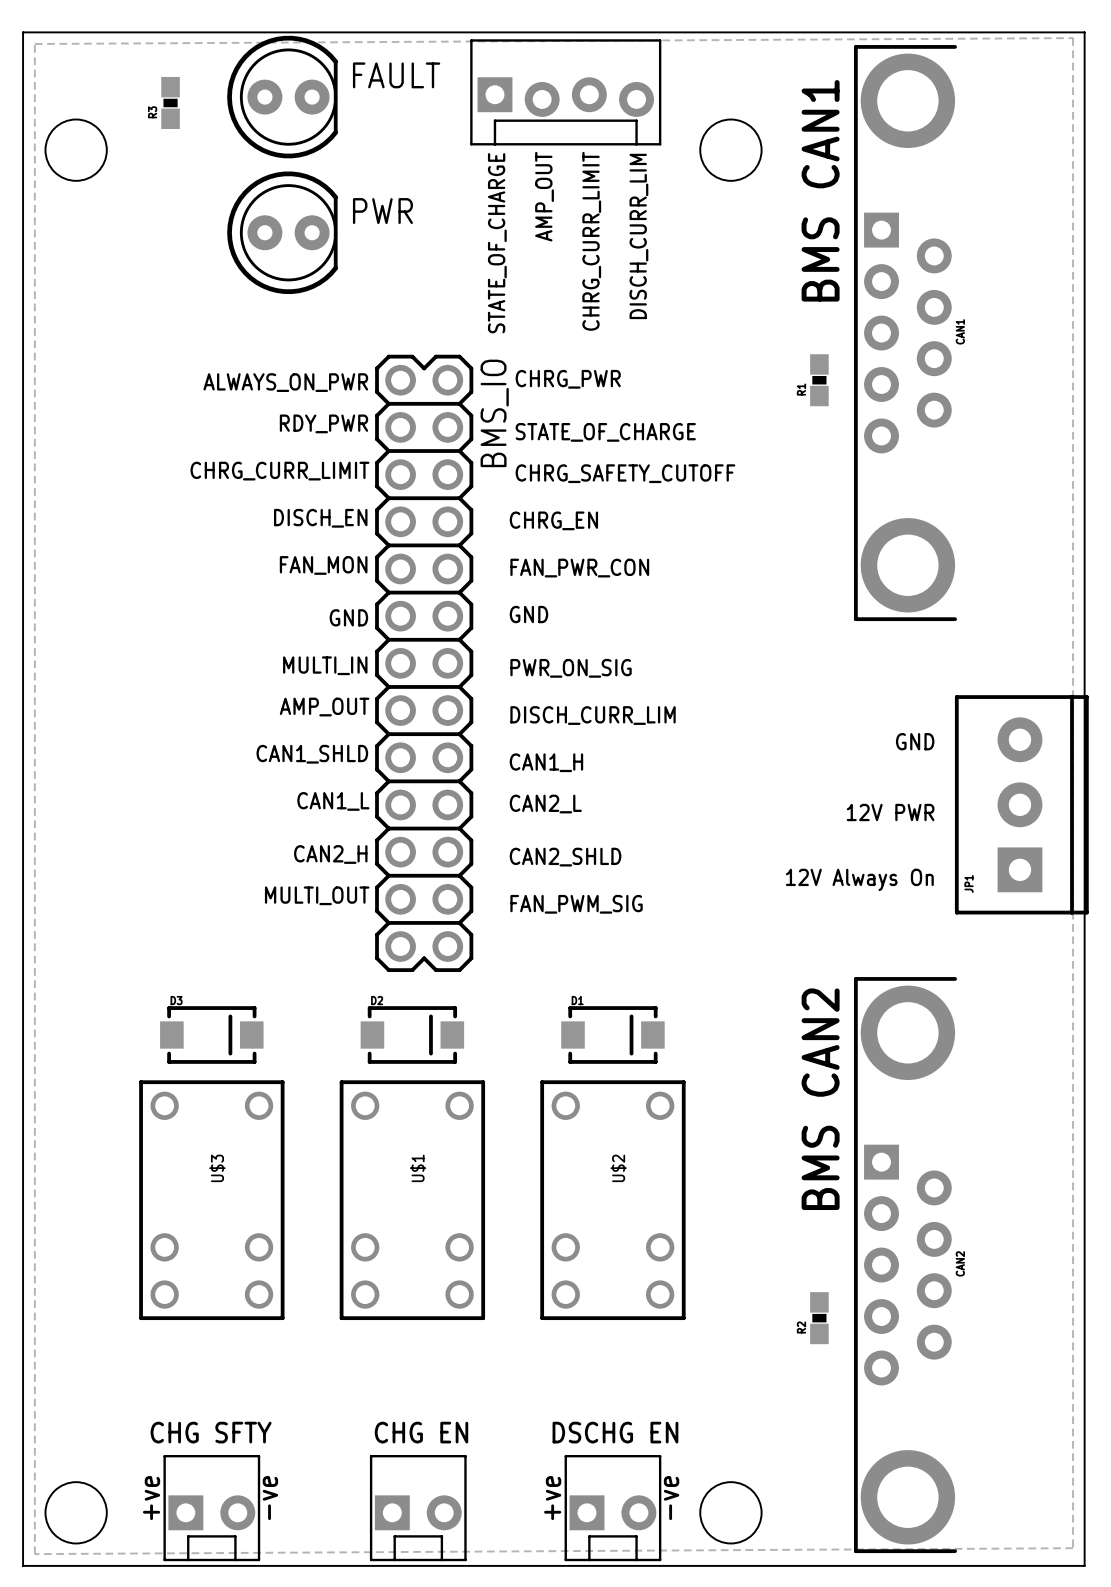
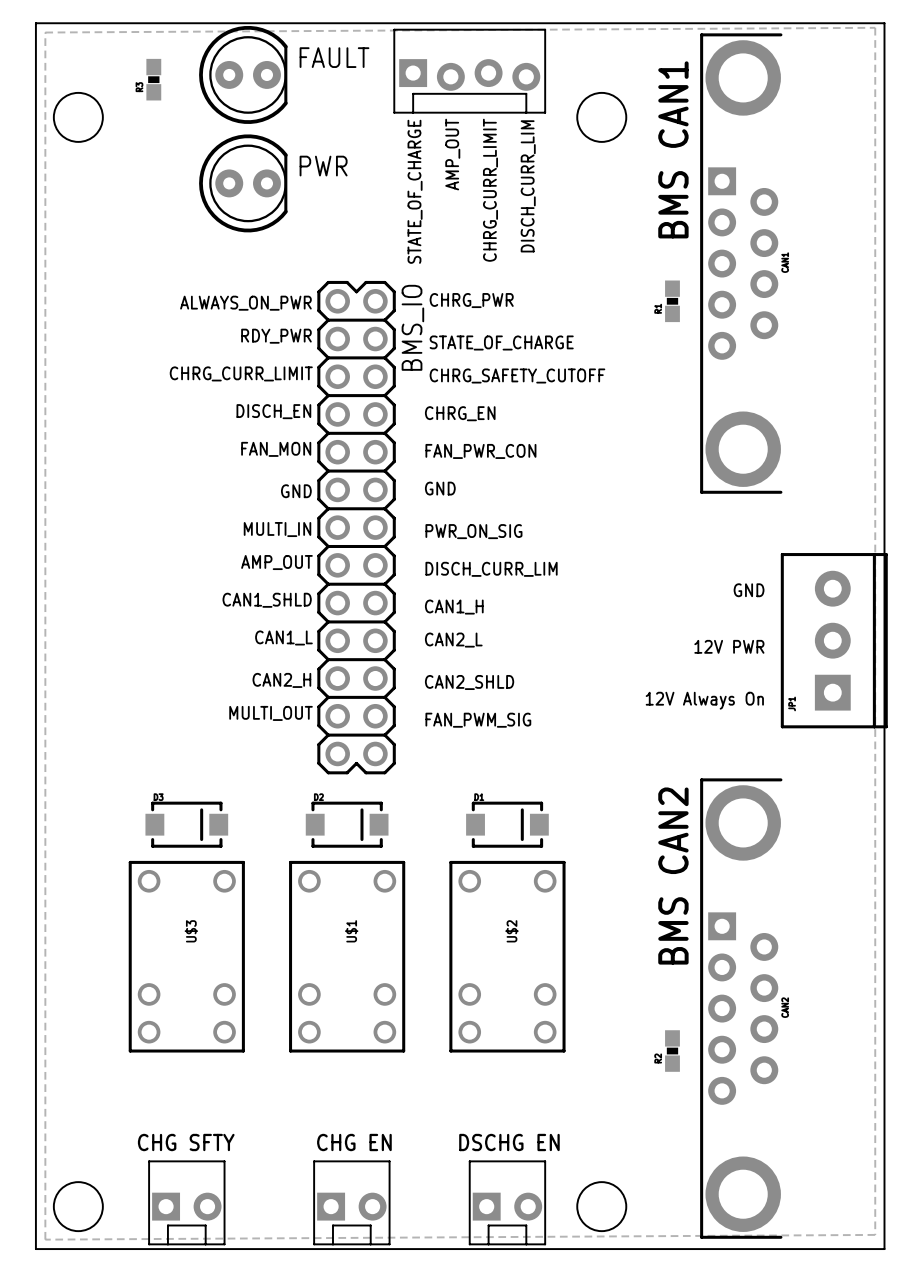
text: +ve (151, 1498) -> none
text: -ve (270, 1498) -> none
text: +ve (552, 1498) -> none
text: -ve (671, 1498) -> none

